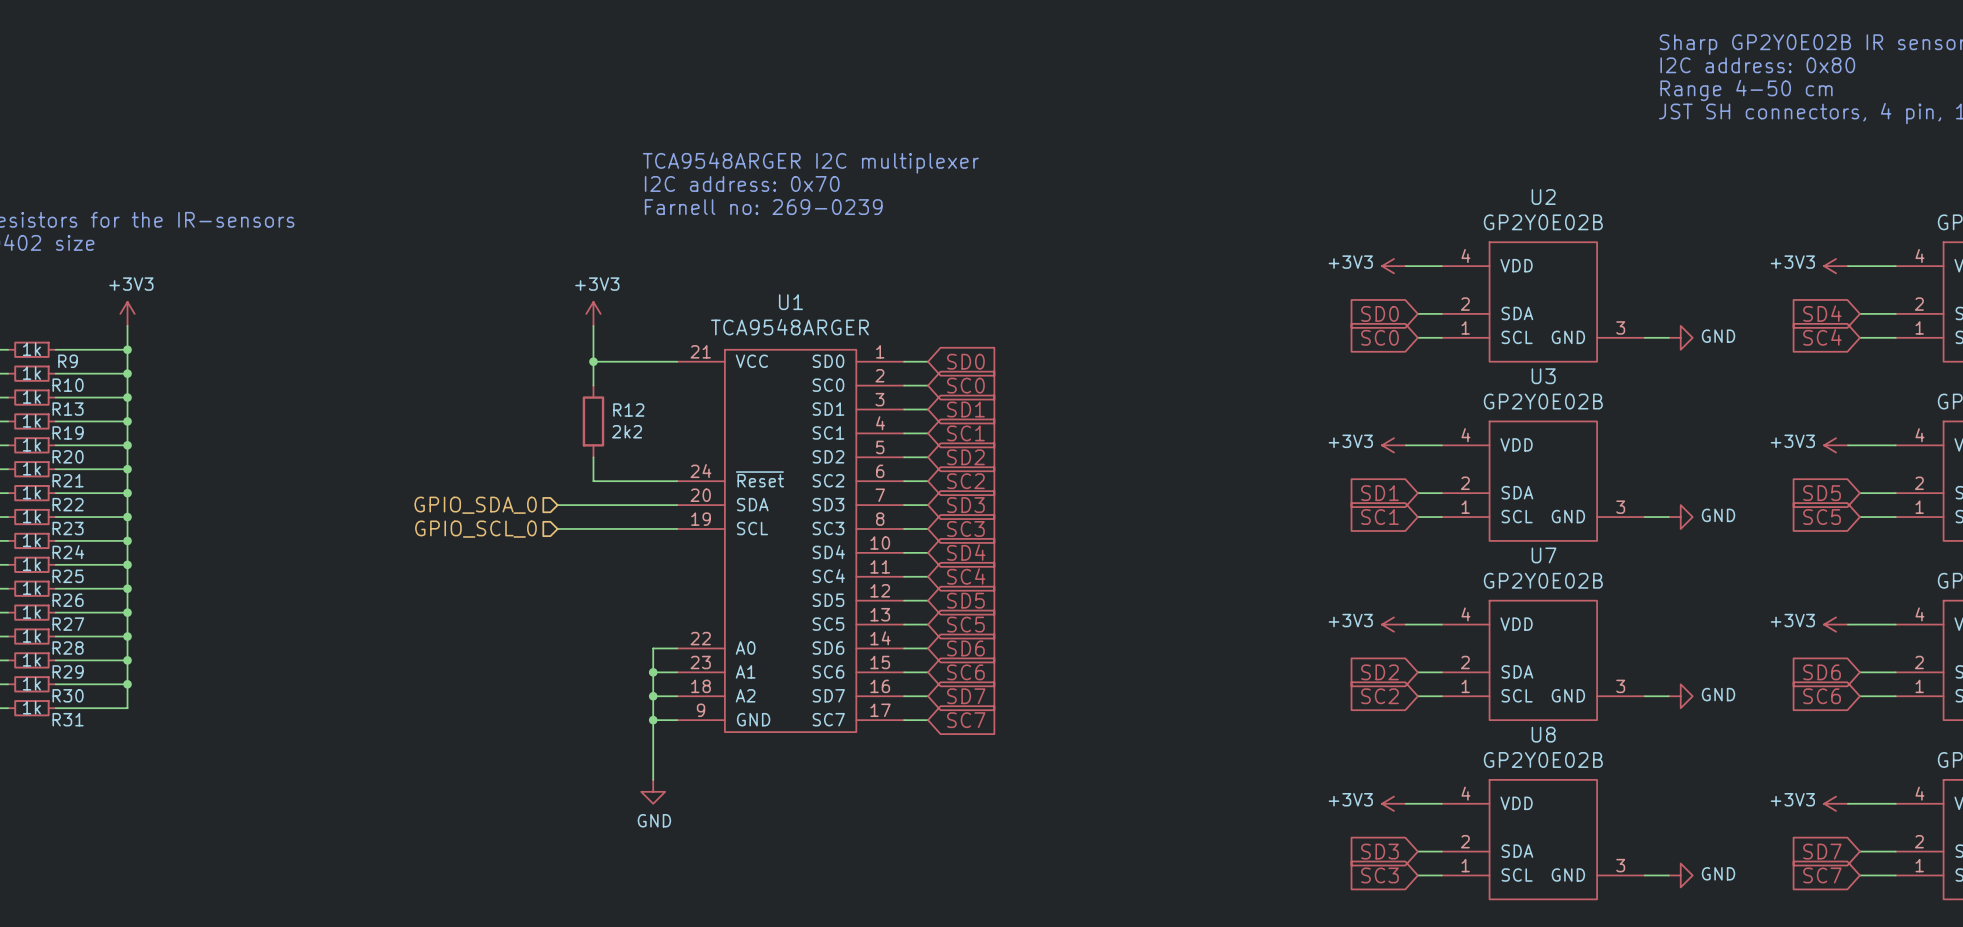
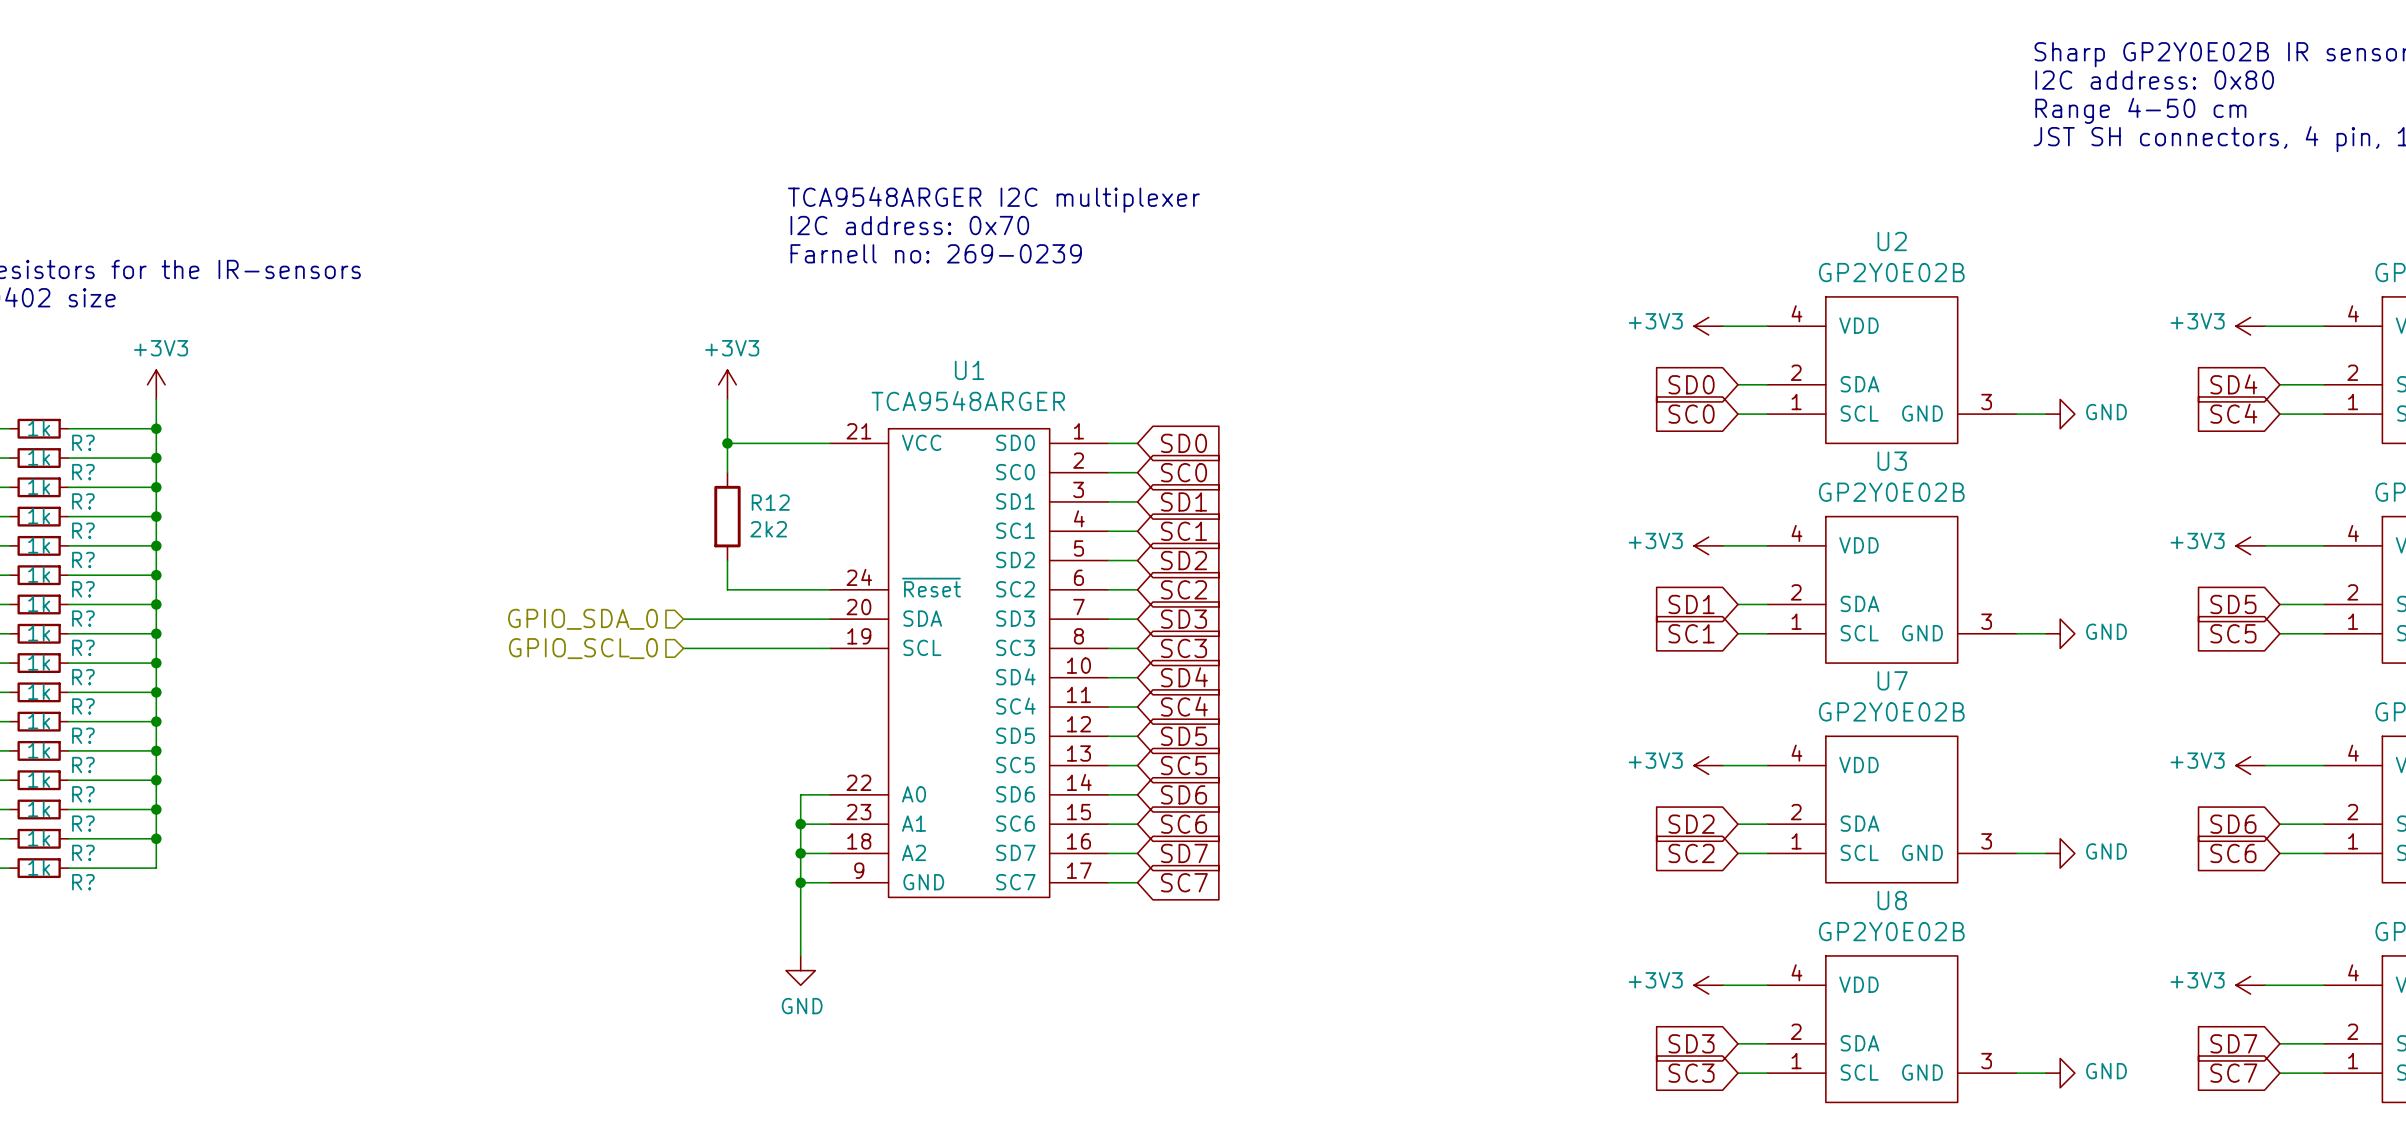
R9 name: R9 (68, 361) -> R? (83, 442)
R10 name: R10 (68, 385) -> R? (83, 472)
R13 name: R13 (68, 409) -> R? (83, 501)
R19 name: R19 (68, 432) -> R? (83, 530)
R20 name: R20 (68, 456) -> R? (83, 560)
R21 name: R21 (68, 480) -> R? (83, 589)
R22 name: R22 (68, 504) -> R? (83, 618)
R23 name: R23 (68, 528) -> R? (83, 647)
R24 name: R24 (68, 552) -> R? (83, 677)
R25 name: R25 (68, 576) -> R? (83, 706)
R26 name: R26 (68, 600) -> R? (83, 735)
R27 name: R27 (68, 624) -> R? (83, 765)
R28 name: R28 (68, 648) -> R? (83, 794)
R29 name: R29 (68, 671) -> R? (83, 823)
R30 name: R30 (68, 695) -> R? (83, 852)
R31 name: R31 (68, 719) -> R? (83, 882)

